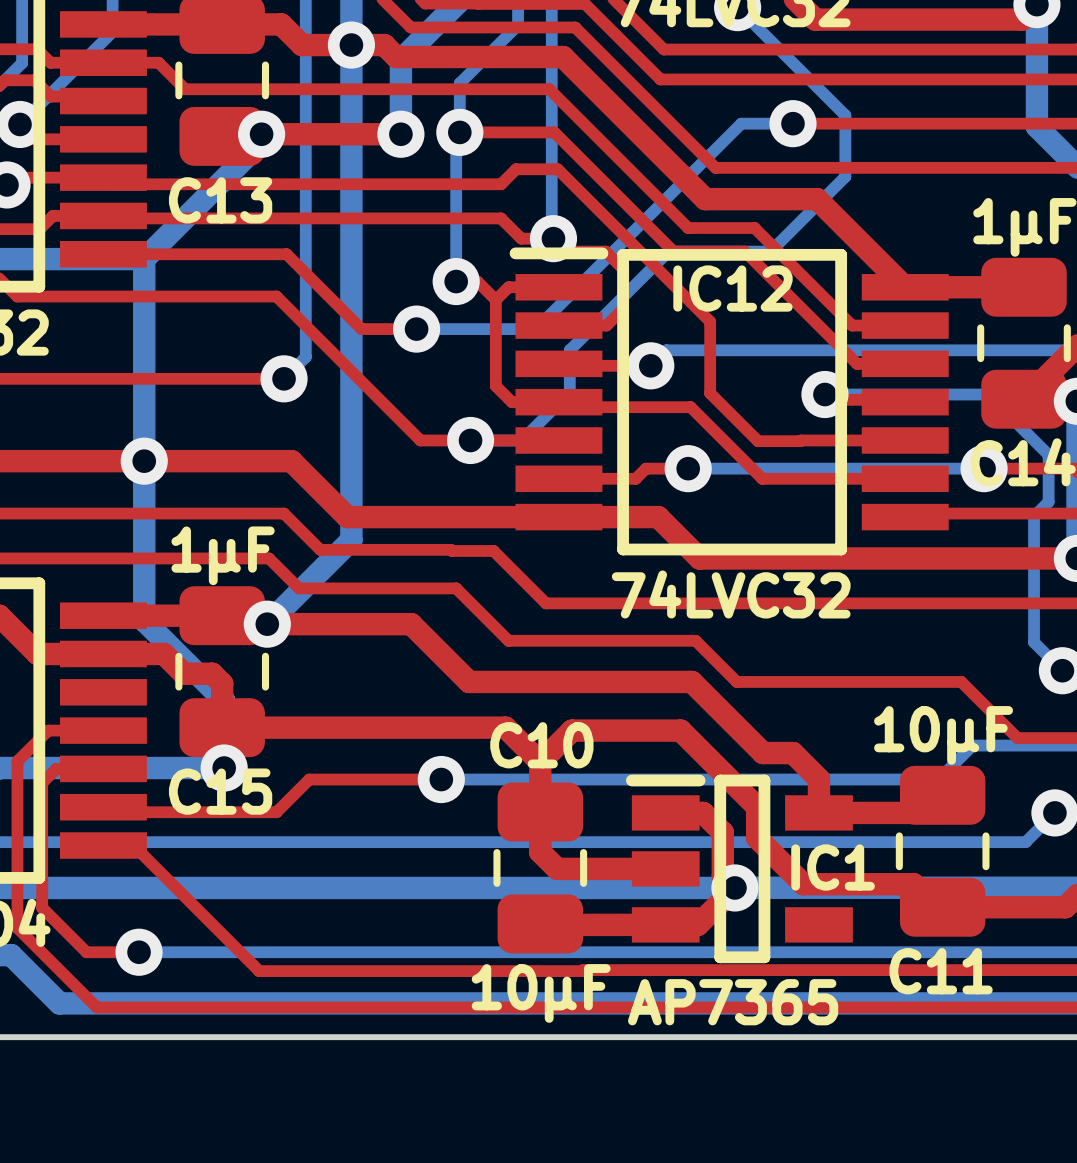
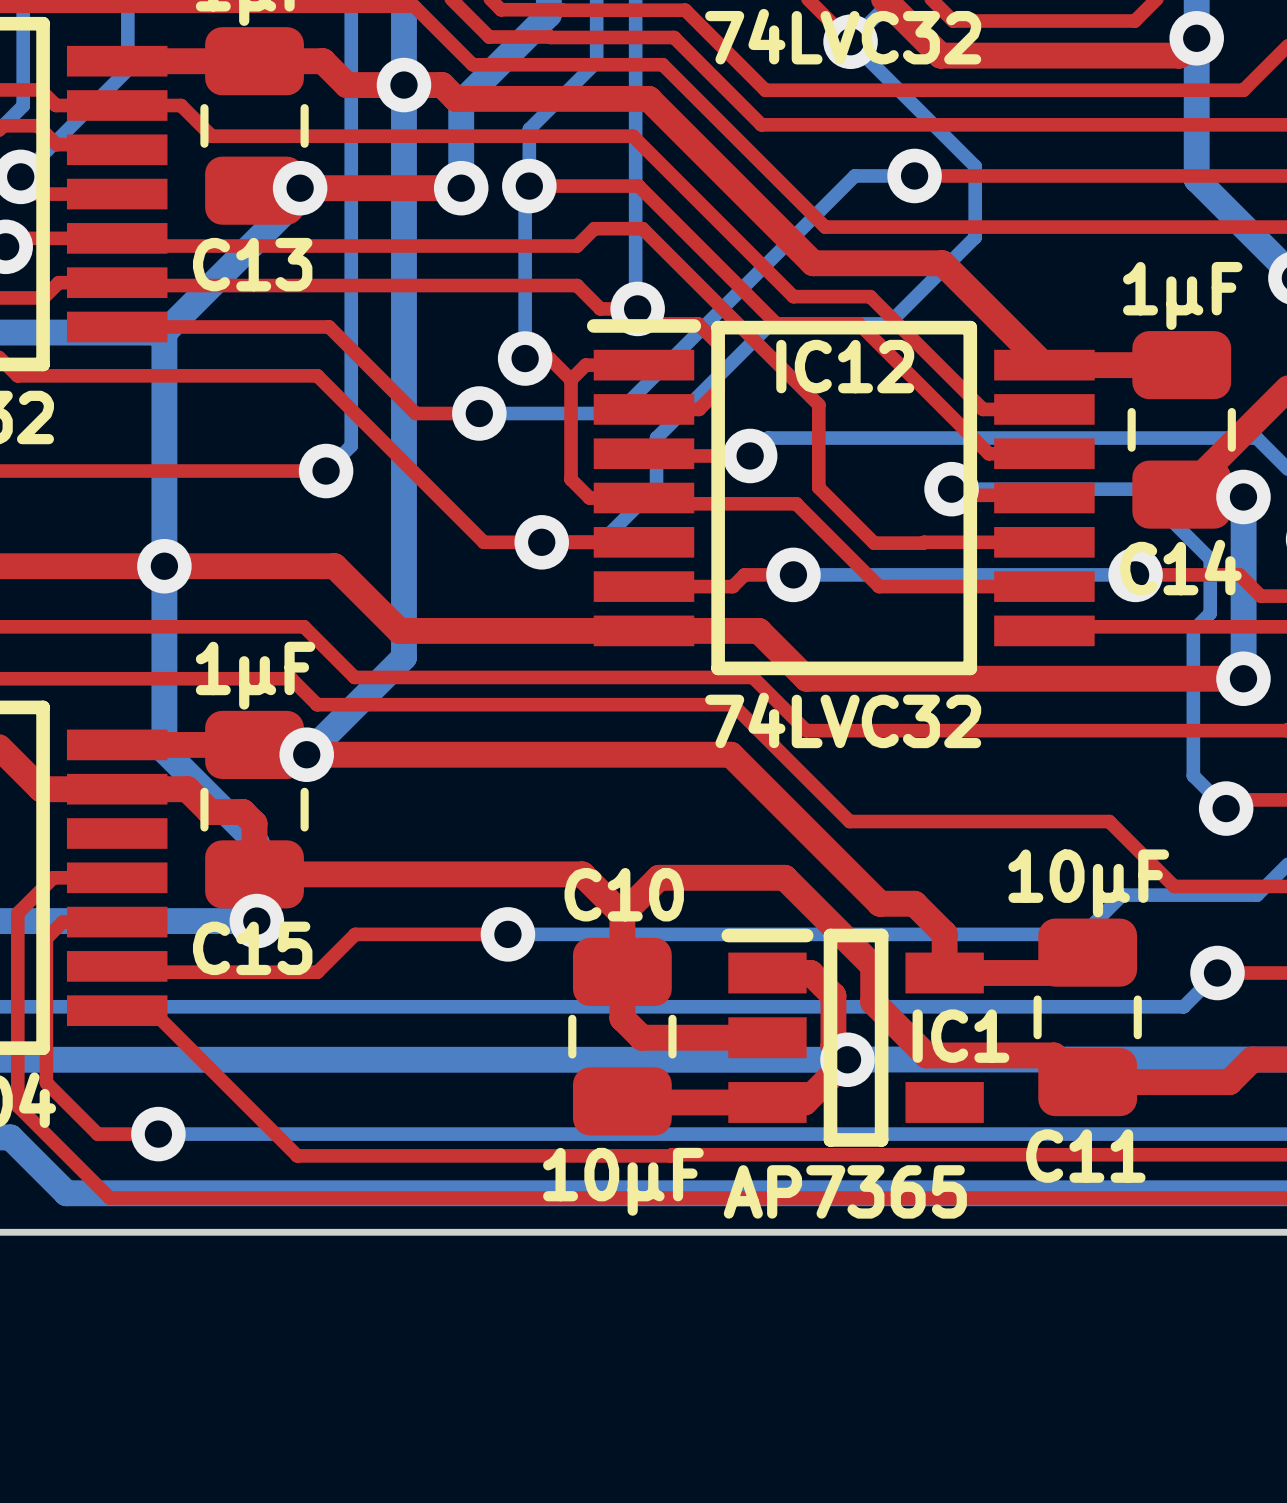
top track: (265, 513) (284, 513) (320, 549) (493, 550) (546, 603) (699, 603) -> (304, 626) (354, 677) (753, 677) (806, 730)
top track: (253, 558) (269, 558) (299, 588) (456, 588) (508, 640) (695, 640) -> (291, 678) (317, 704) (732, 704) (802, 773)
top track: (411, 624) (469, 681) (691, 681) -> (473, 754) (730, 754) (797, 821)

